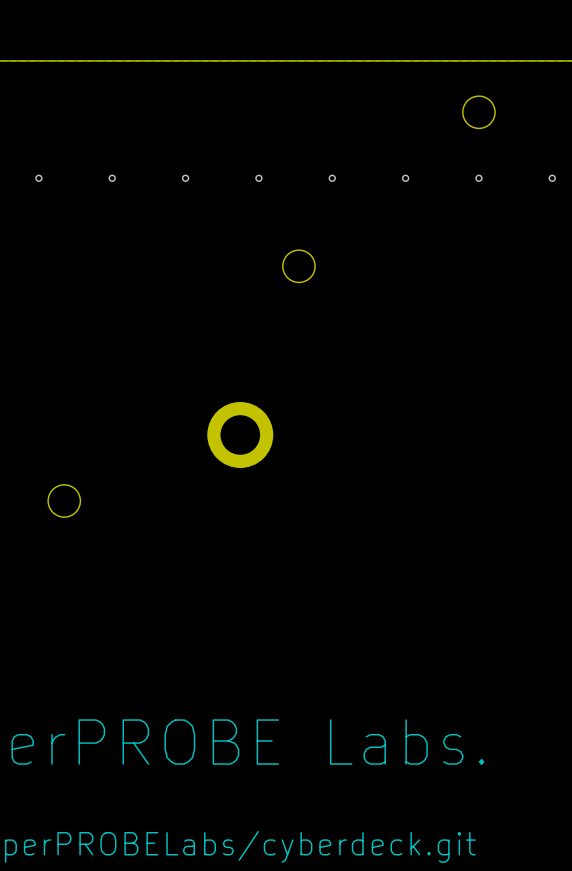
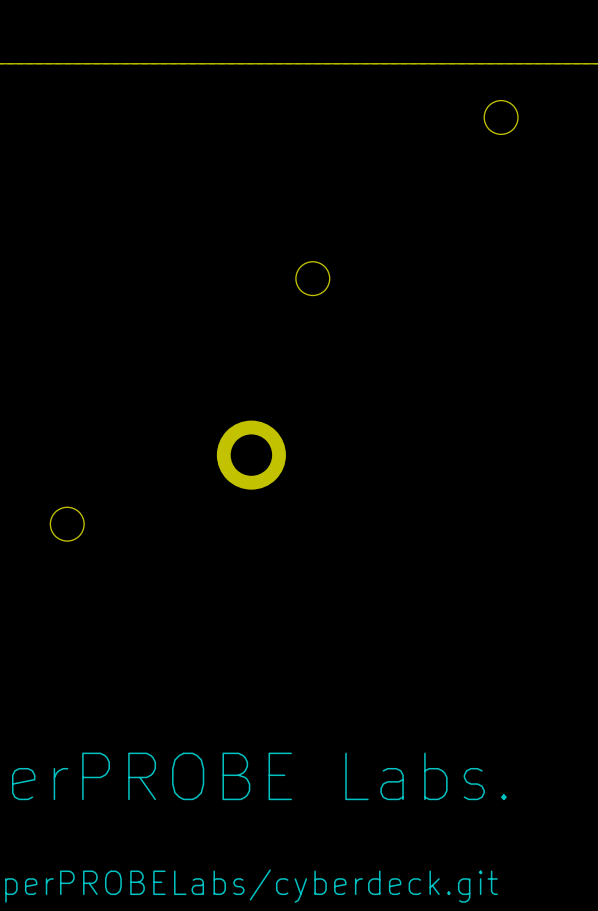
via: (38, 178) -> none
via: (112, 178) -> none
via: (185, 178) -> none
via: (258, 178) -> none
via: (332, 178) -> none
via: (405, 178) -> none
via: (478, 178) -> none
via: (552, 178) -> none

